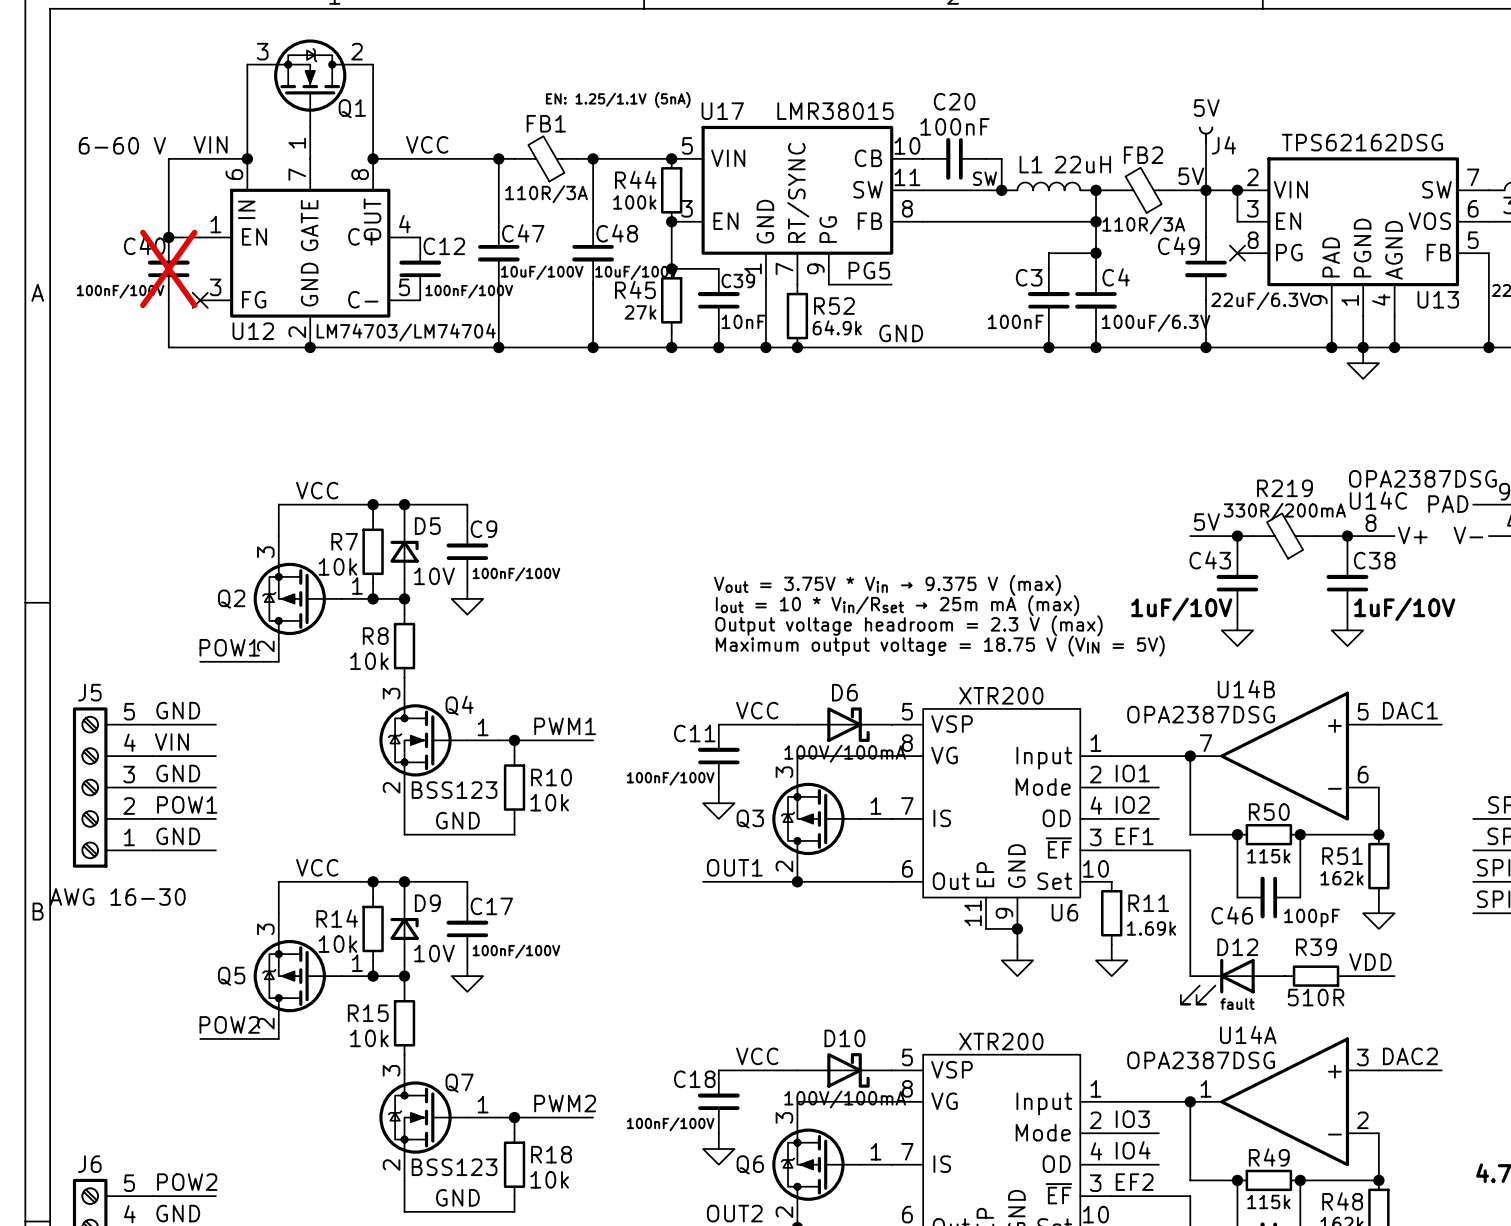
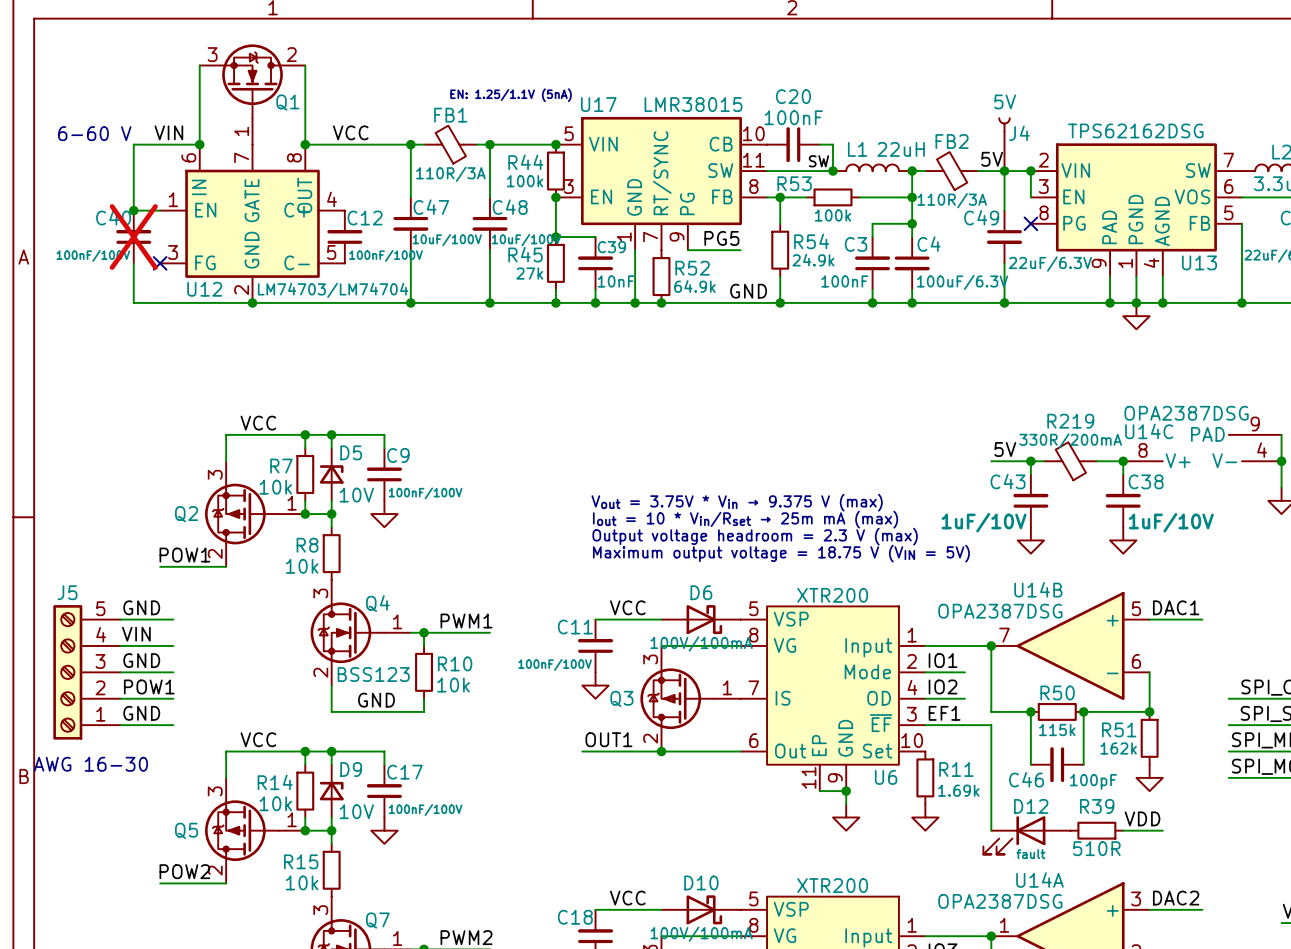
wire: none -> (780, 197) (780, 223)
junction: none -> (780, 197)
wire: (970, 221) (1033, 221) -> none
R53: none -> 100k (833, 197)
R54: none -> 24.9k (780, 250)
wire: none -> (780, 276) (780, 302)
junction: none -> (780, 302)

